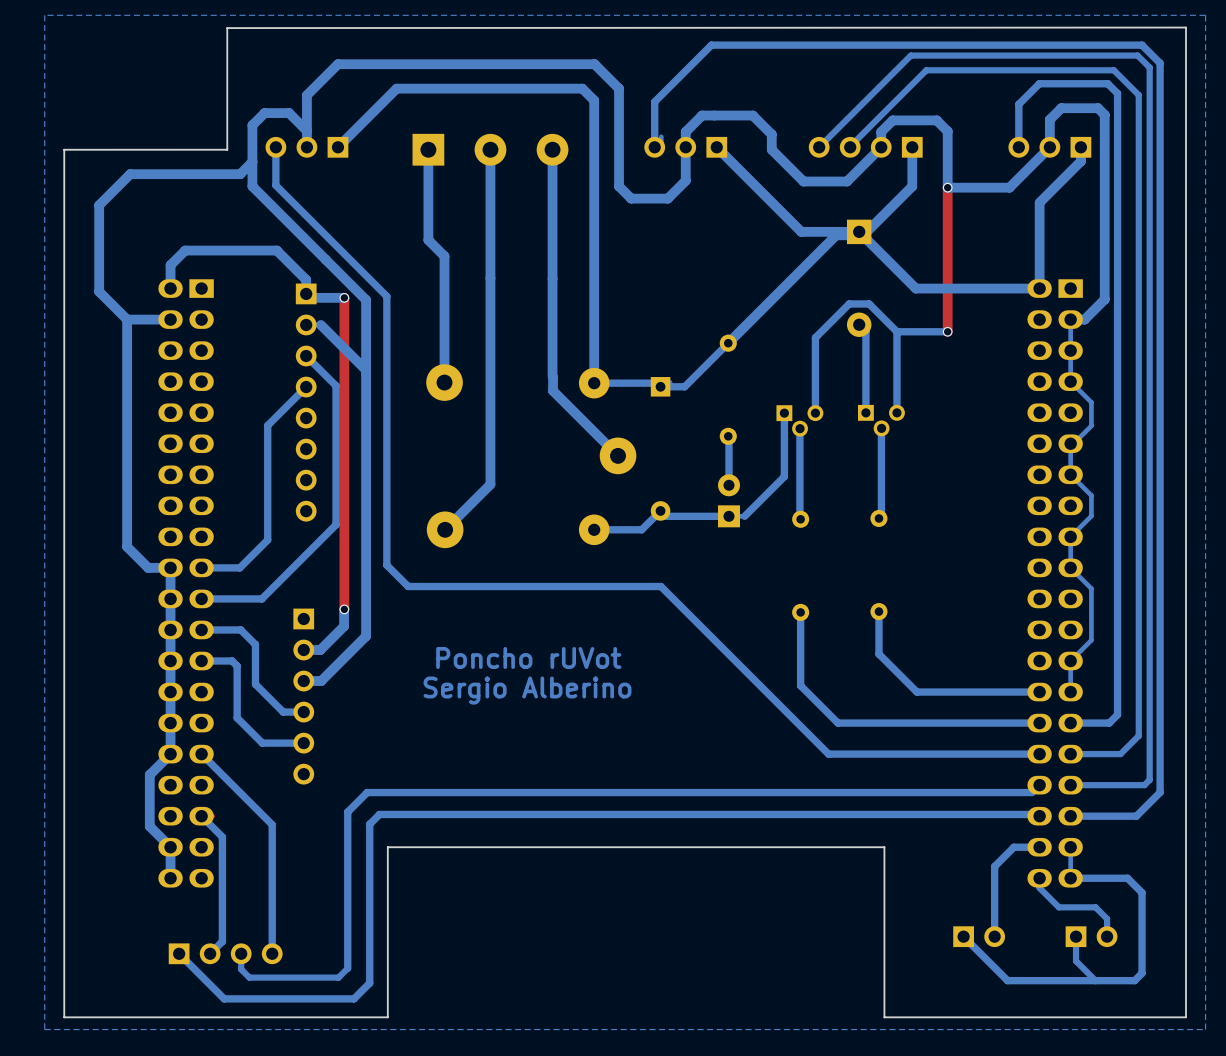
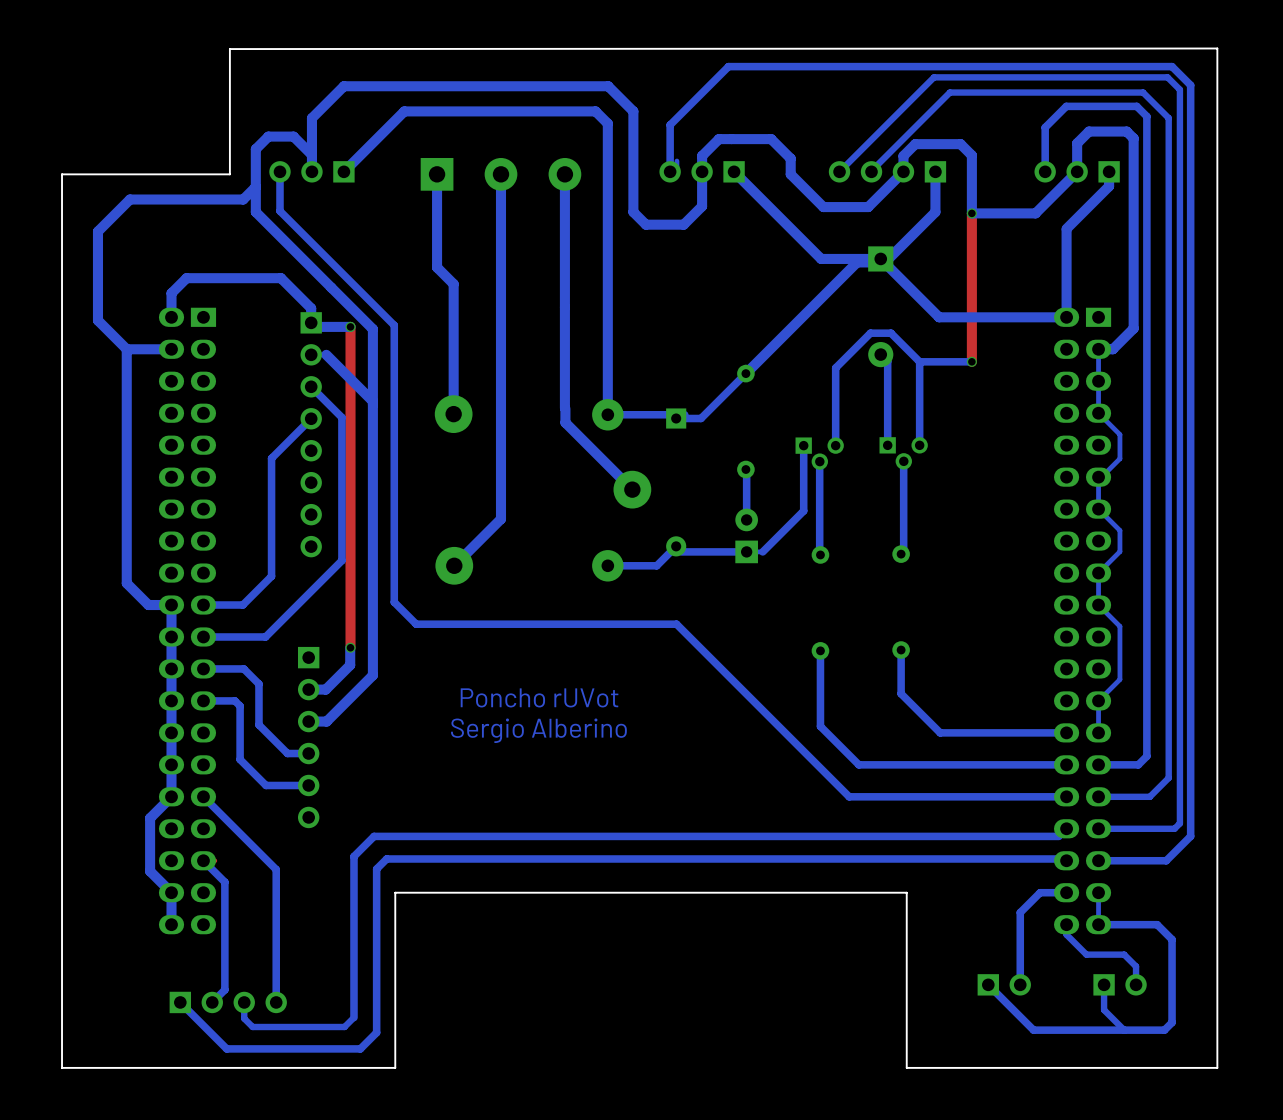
bottom zone outline: (1205, 15) (1205, 1029) (44, 1029) (44, 15) (1205, 15) -> none

